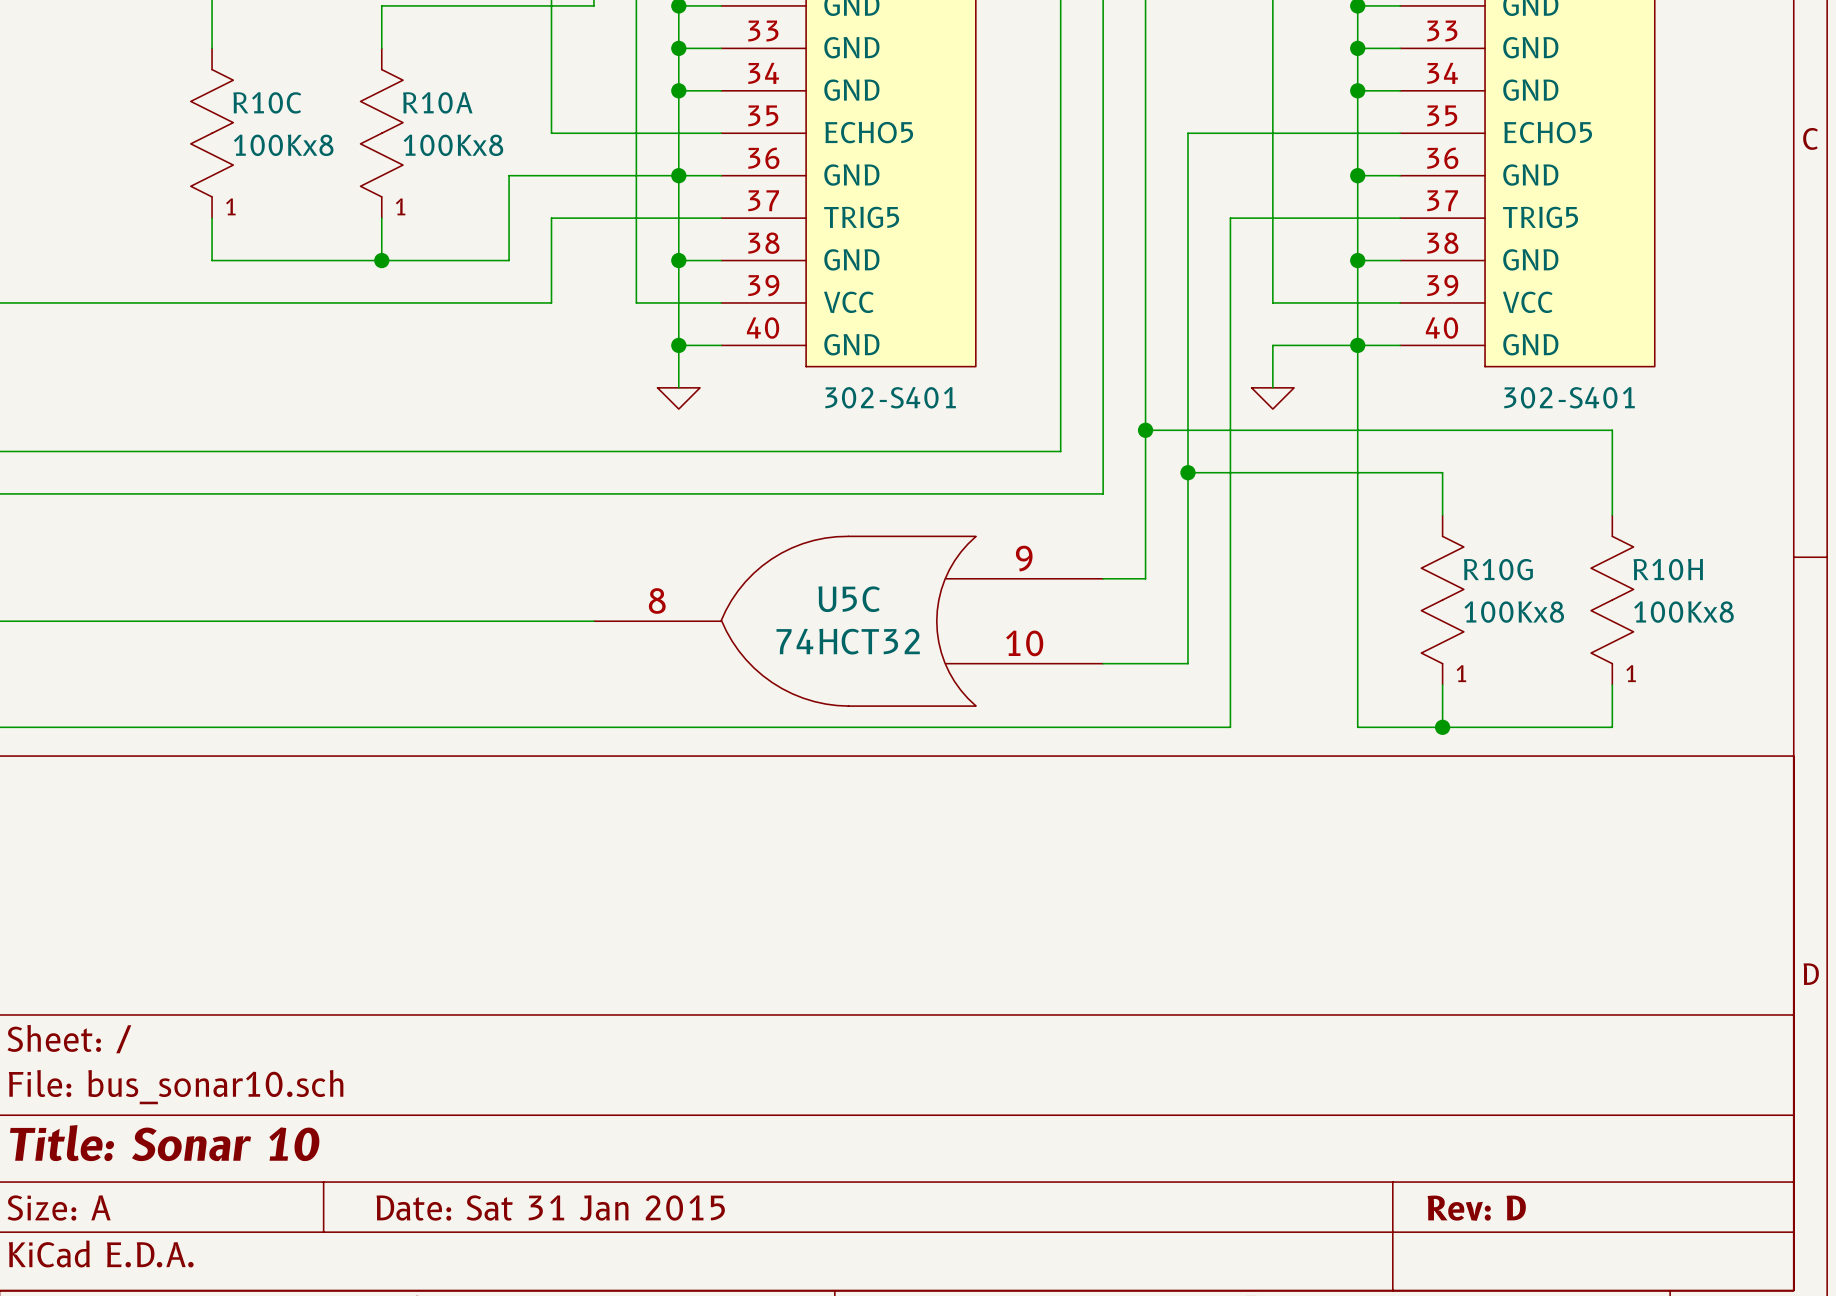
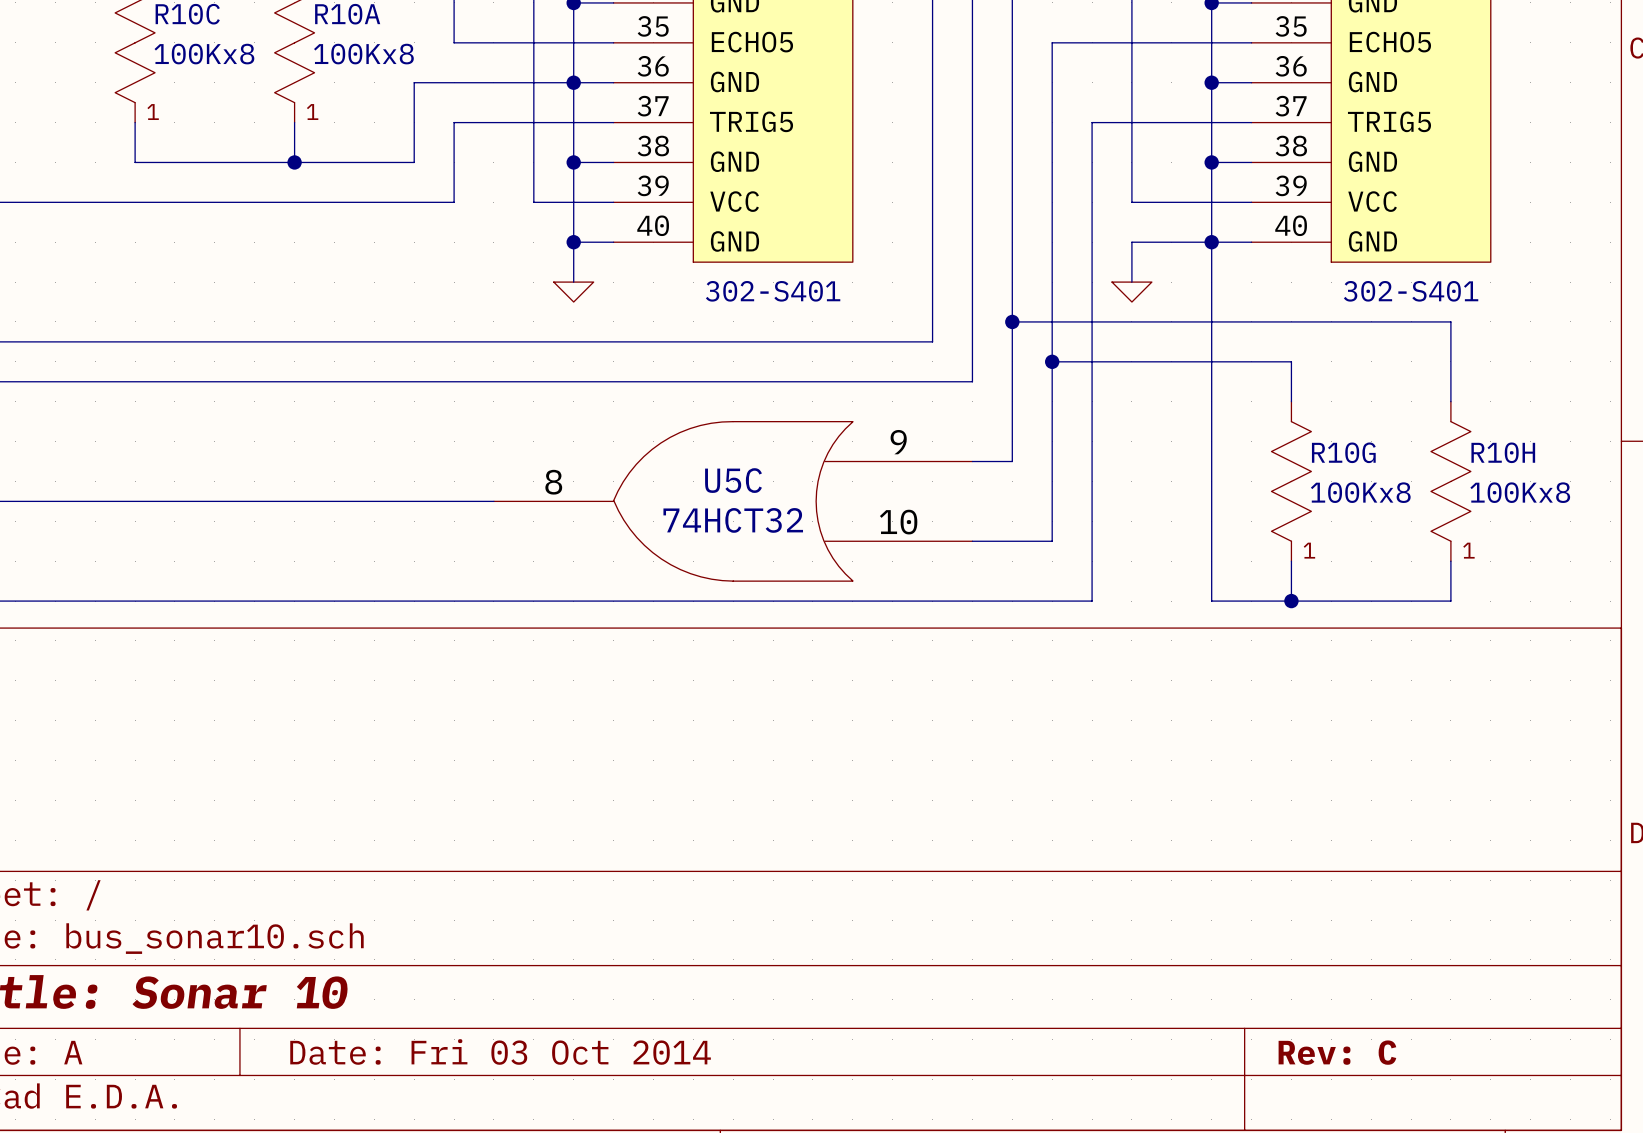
title block: Date: Sat 31 Jan 2015 (550, 1207) -> Date: Fri 03 Oct 2014 (500, 1051)
title block: Rev: D (1476, 1208) -> Rev: C (1337, 1052)

